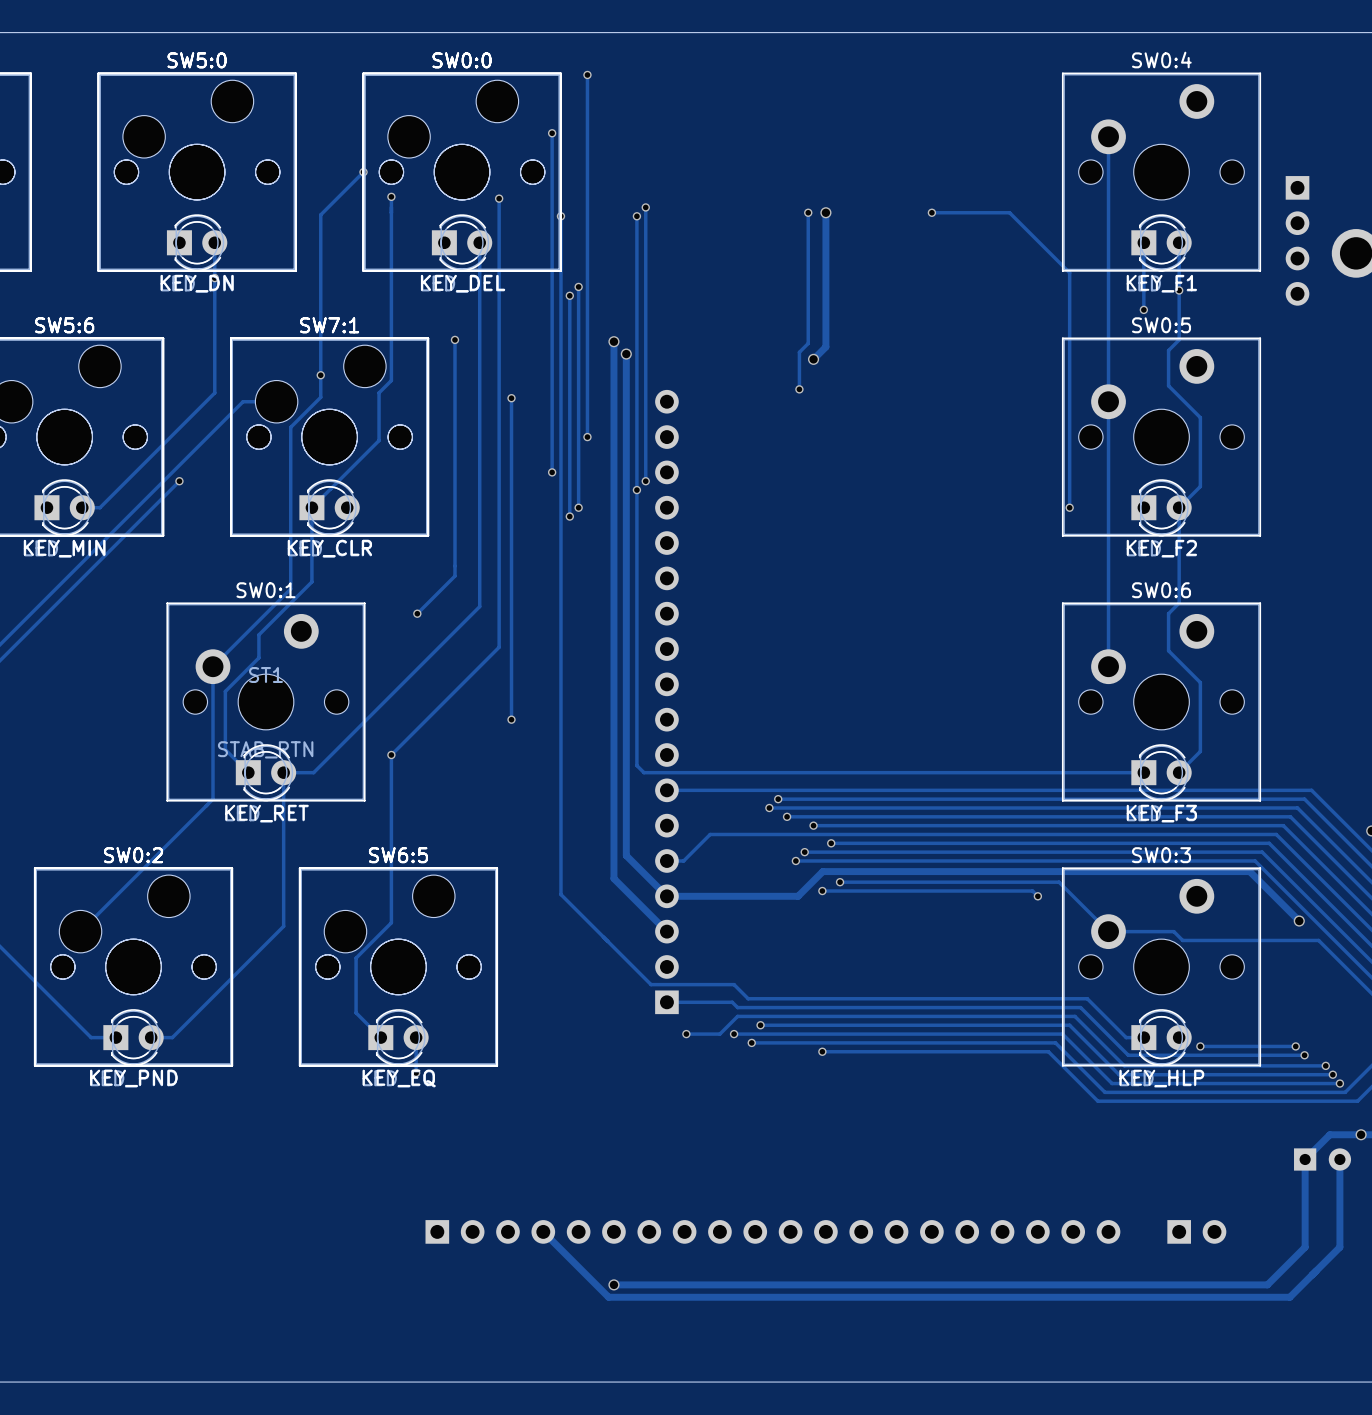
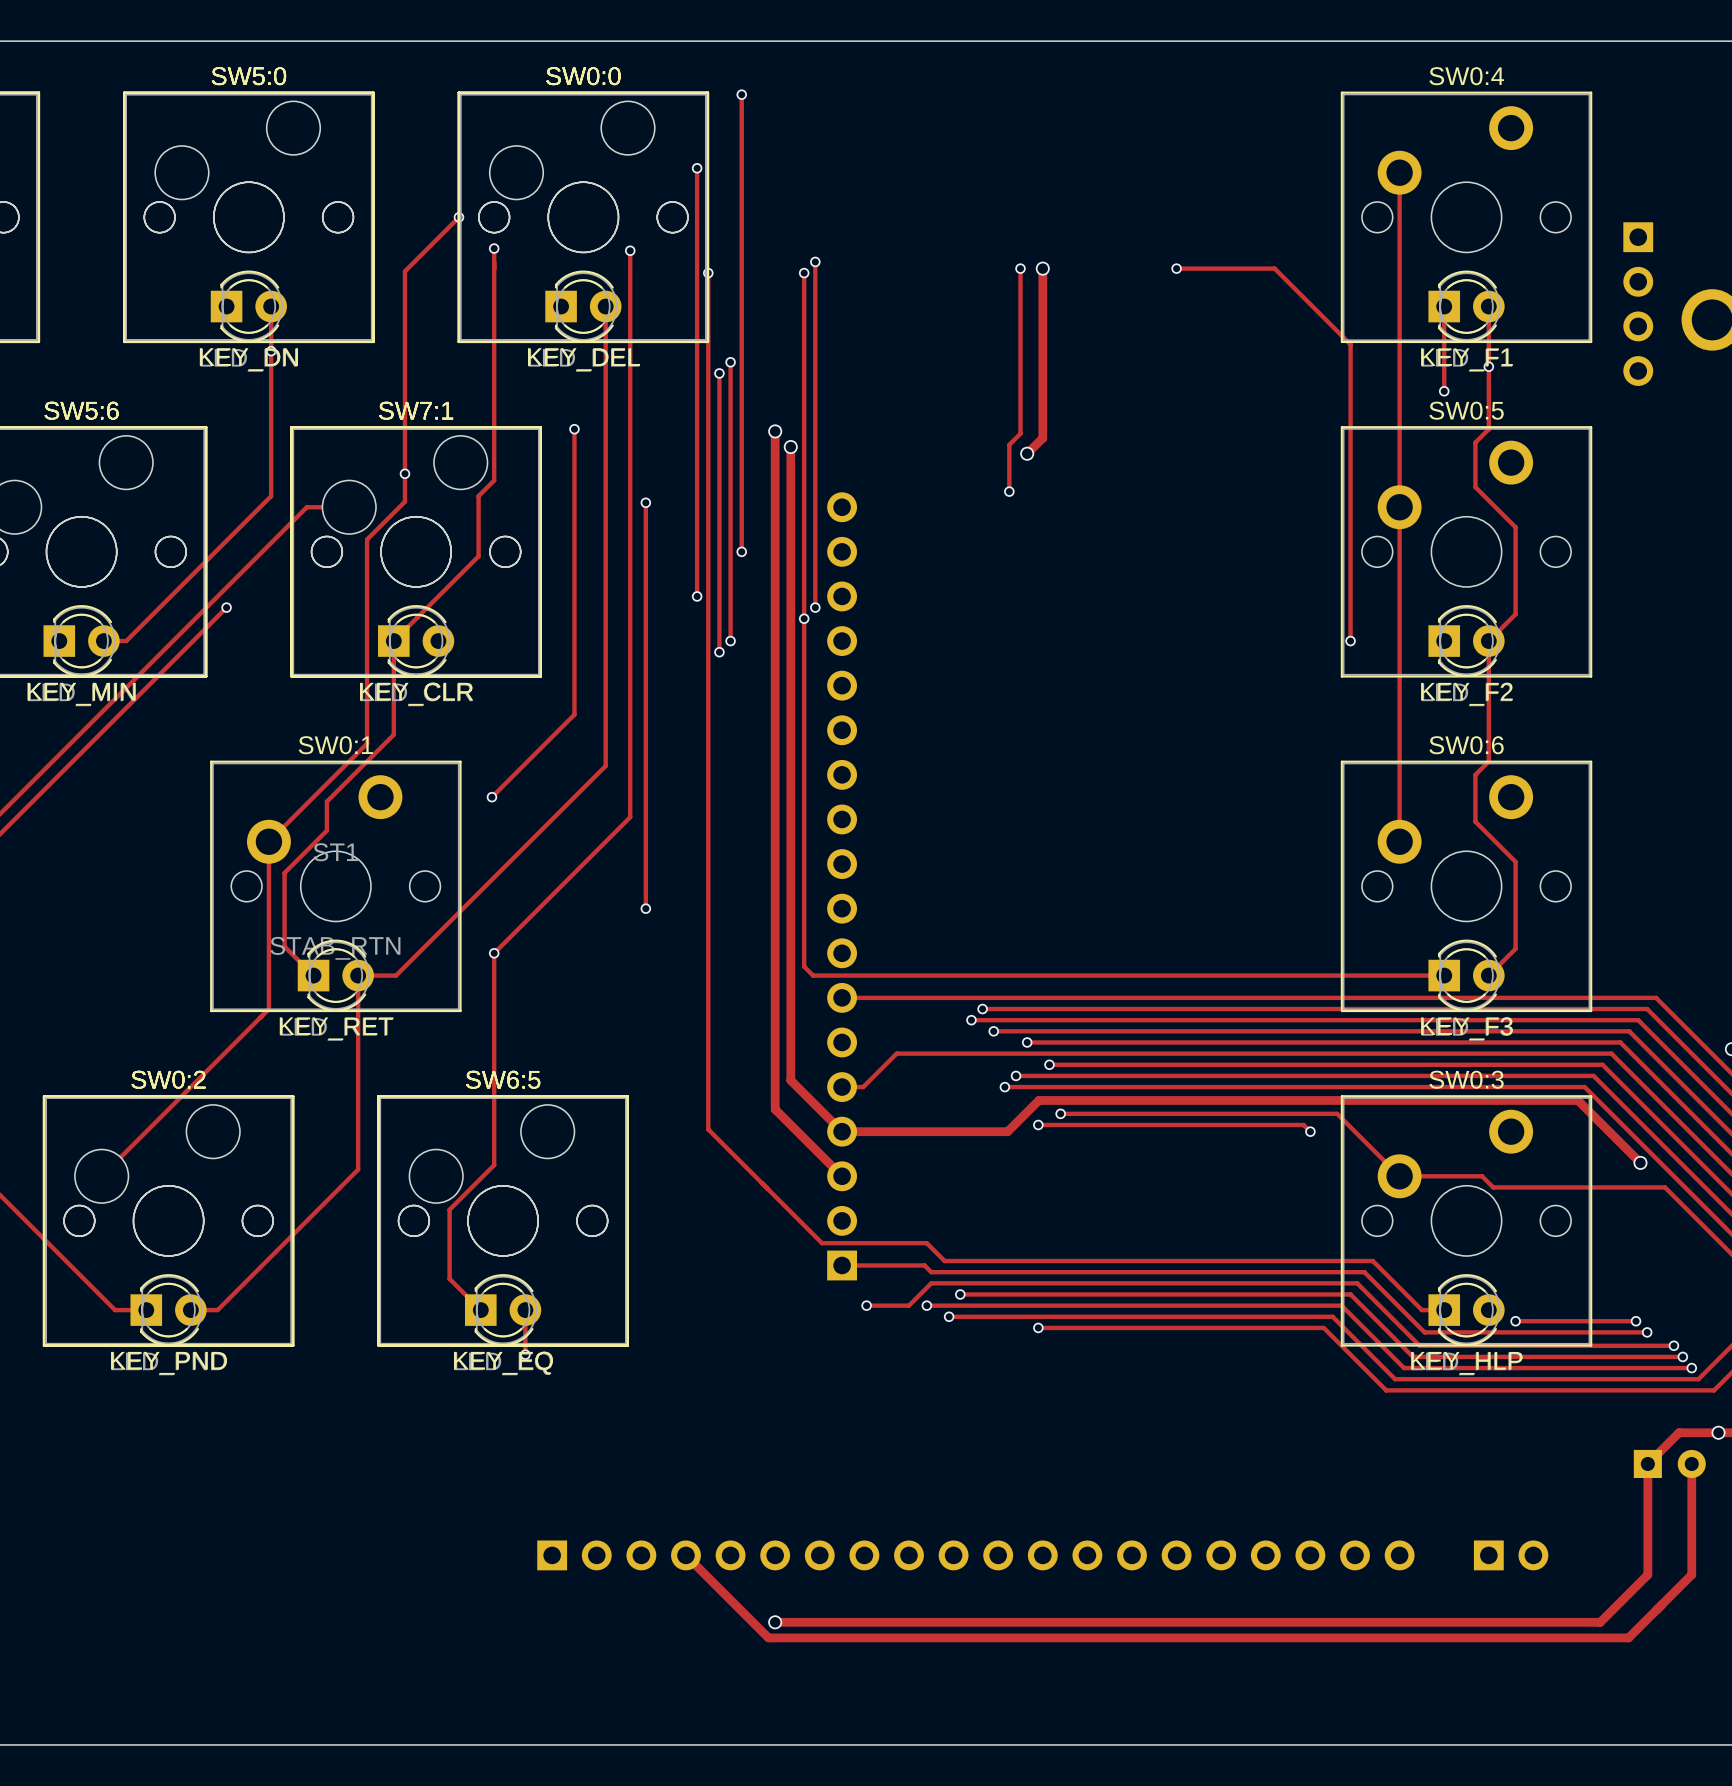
track: (454, 566) (454, 576) (417, 613) -> (574, 714) (491, 797)
via position: (417, 613) -> (491, 797)

